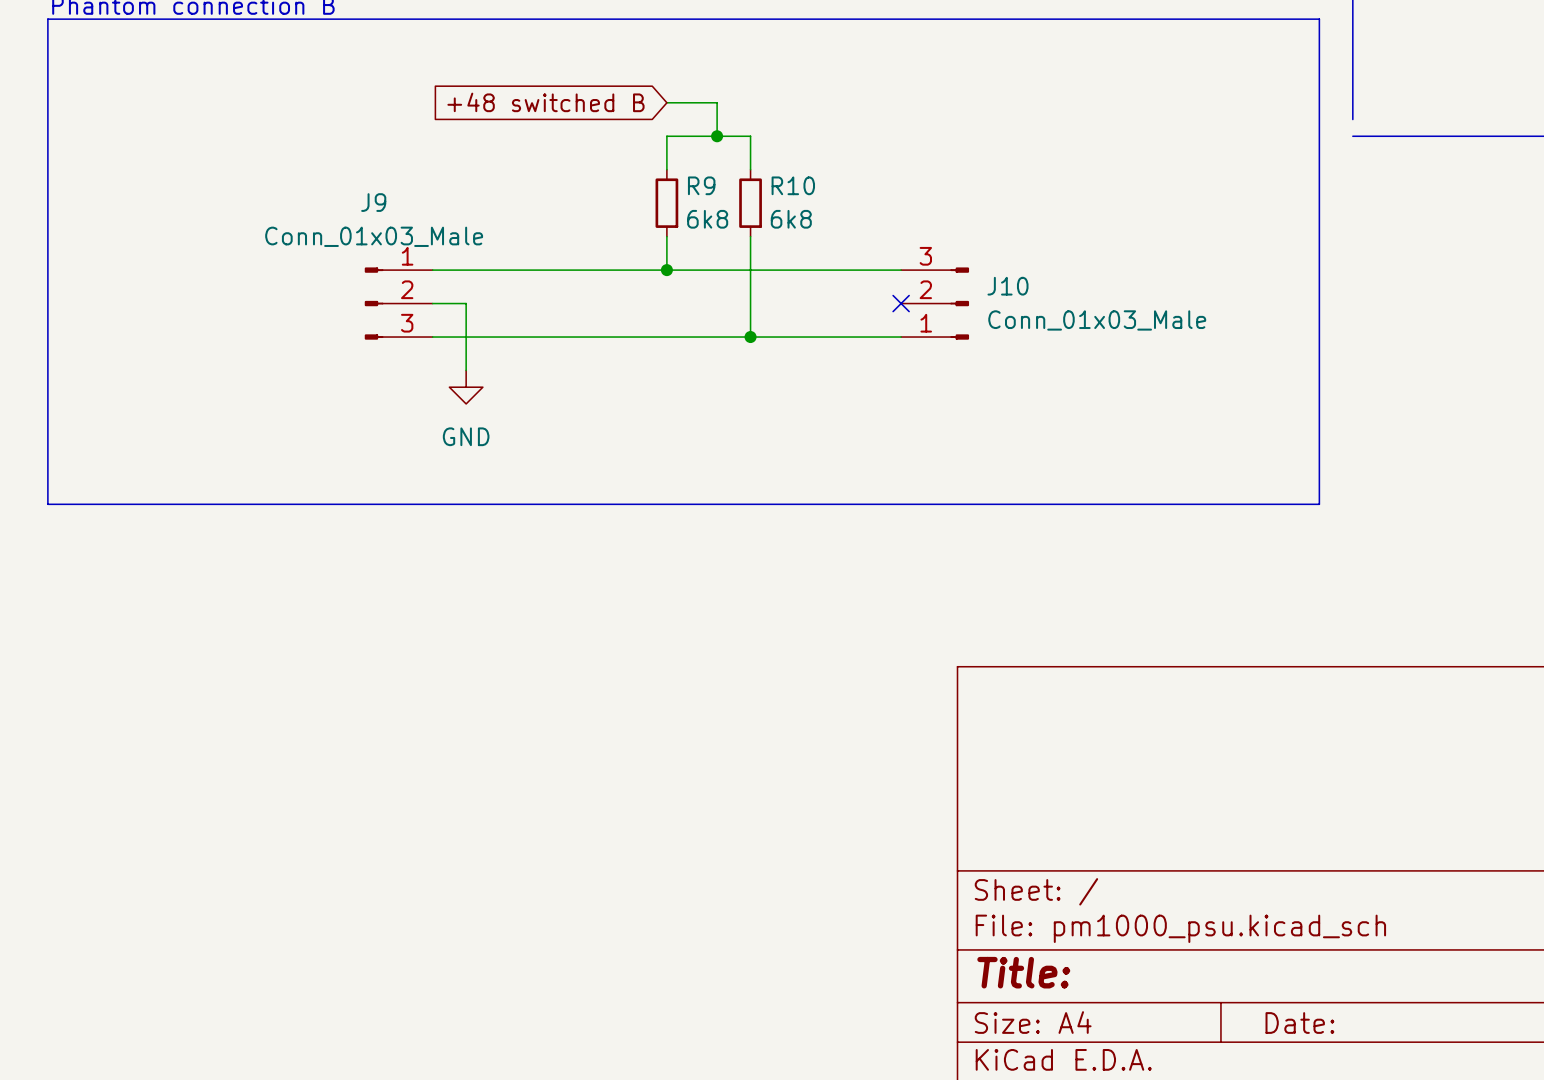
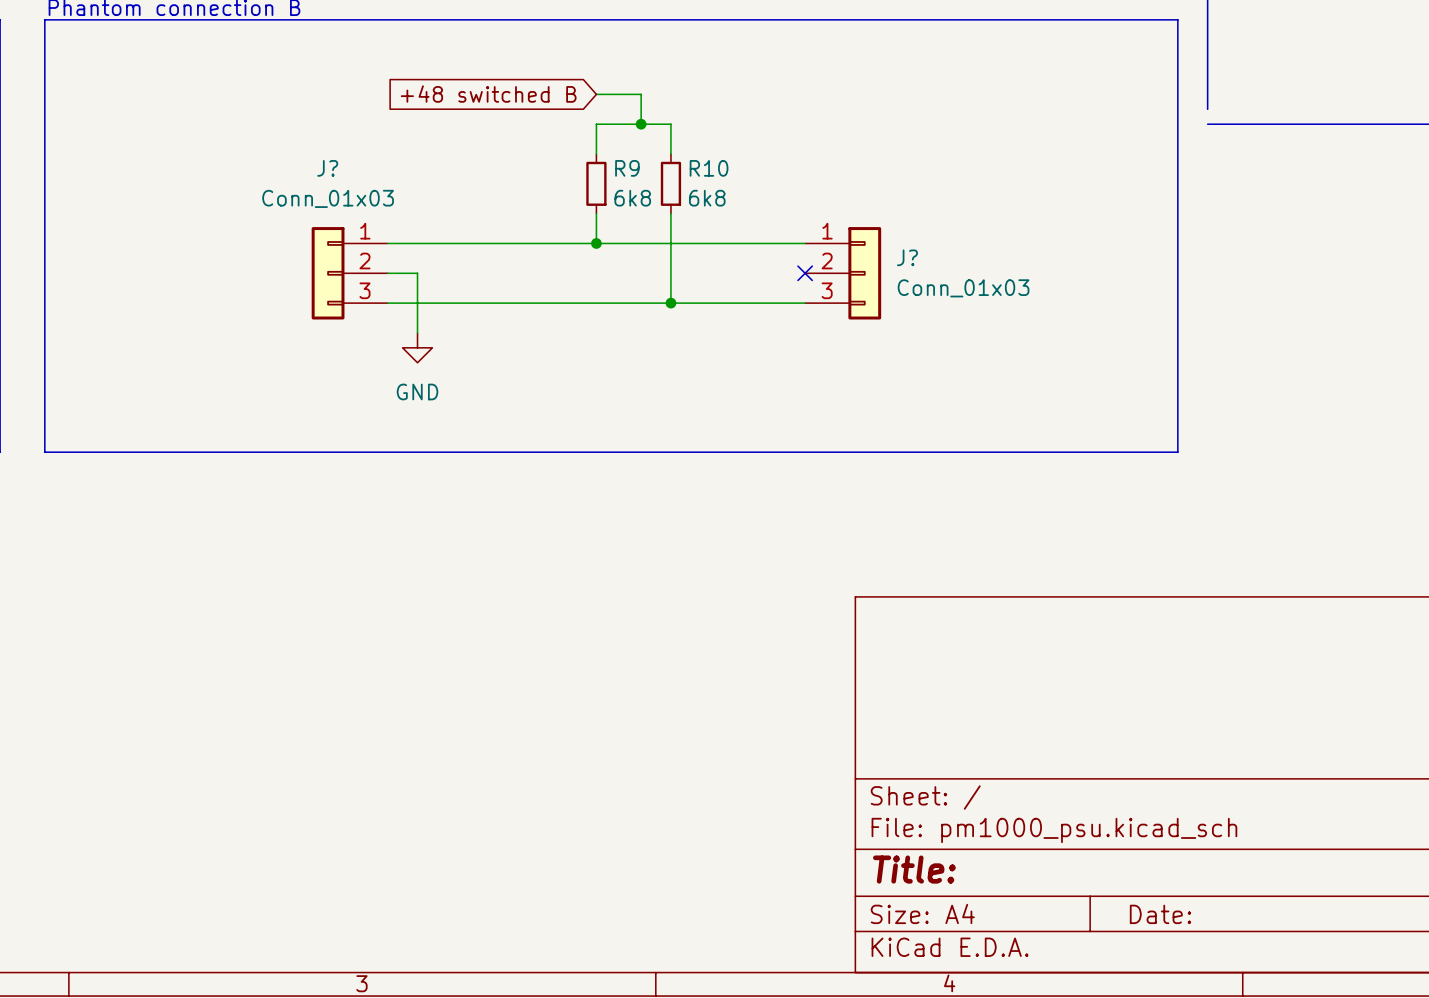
J?: none -> Conn_01x03 (349, 273)
J9: Conn_01x03_Male (398, 303) -> none
J10: Conn_01x03_Male (935, 303) -> none
J?: none -> Conn_01x03 (843, 273)

